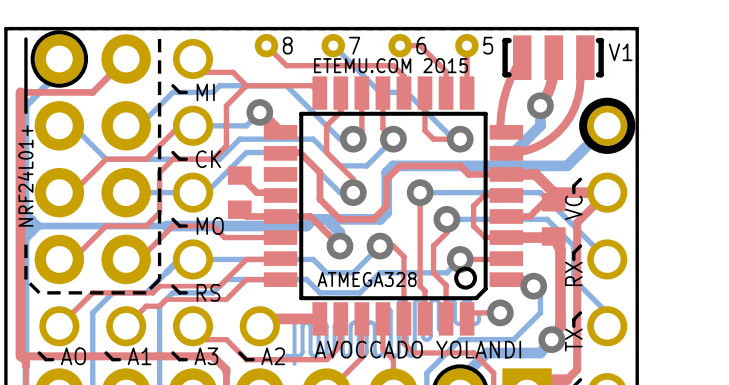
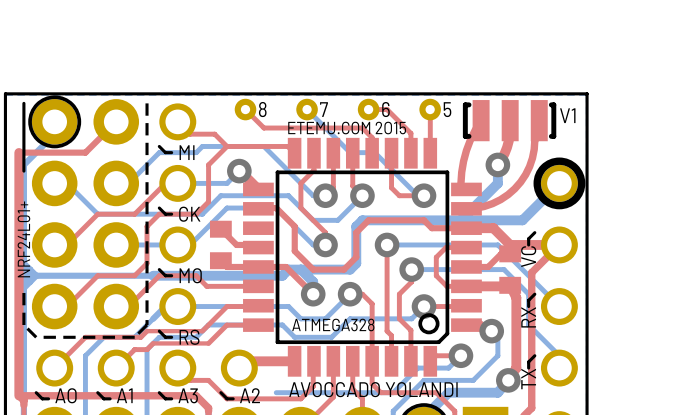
bottom track: (500, 312) (481, 313) (478, 322) (473, 323) (470, 320) (470, 302) (465, 299) (462, 303) (462, 320) (457, 323) (454, 320) (454, 302) (449, 299) (446, 303) (446, 328) (442, 331) (438, 328) (438, 302) (433, 300) (430, 303) (430, 336) (426, 339) (422, 336) (422, 302) (417, 300) (414, 303) (414, 352) (410, 355) (406, 352) (406, 303) (401, 299) (398, 303) (398, 351) (396, 355) (392, 355) (390, 352) (390, 311) (386, 307) (382, 311) (382, 351) (380, 355) (374, 352) (374, 325) (370, 322) (366, 325) (366, 352) (364, 355) (361, 355) (358, 352) (358, 325) (354, 322) (350, 325) (349, 354) (346, 355) (342, 353) (342, 325) (338, 322) (334, 325) (334, 352) (332, 355) (328, 355) (326, 325) (322, 322) (318, 325) (318, 352) (313, 355) (310, 352) (310, 325) (306, 322) (302, 325) (302, 353) (299, 355) (286, 355) -> (460, 355) (448, 368) (417, 368) (393, 392) (276, 392)
bottom track: (294, 315) (294, 363) -> none

